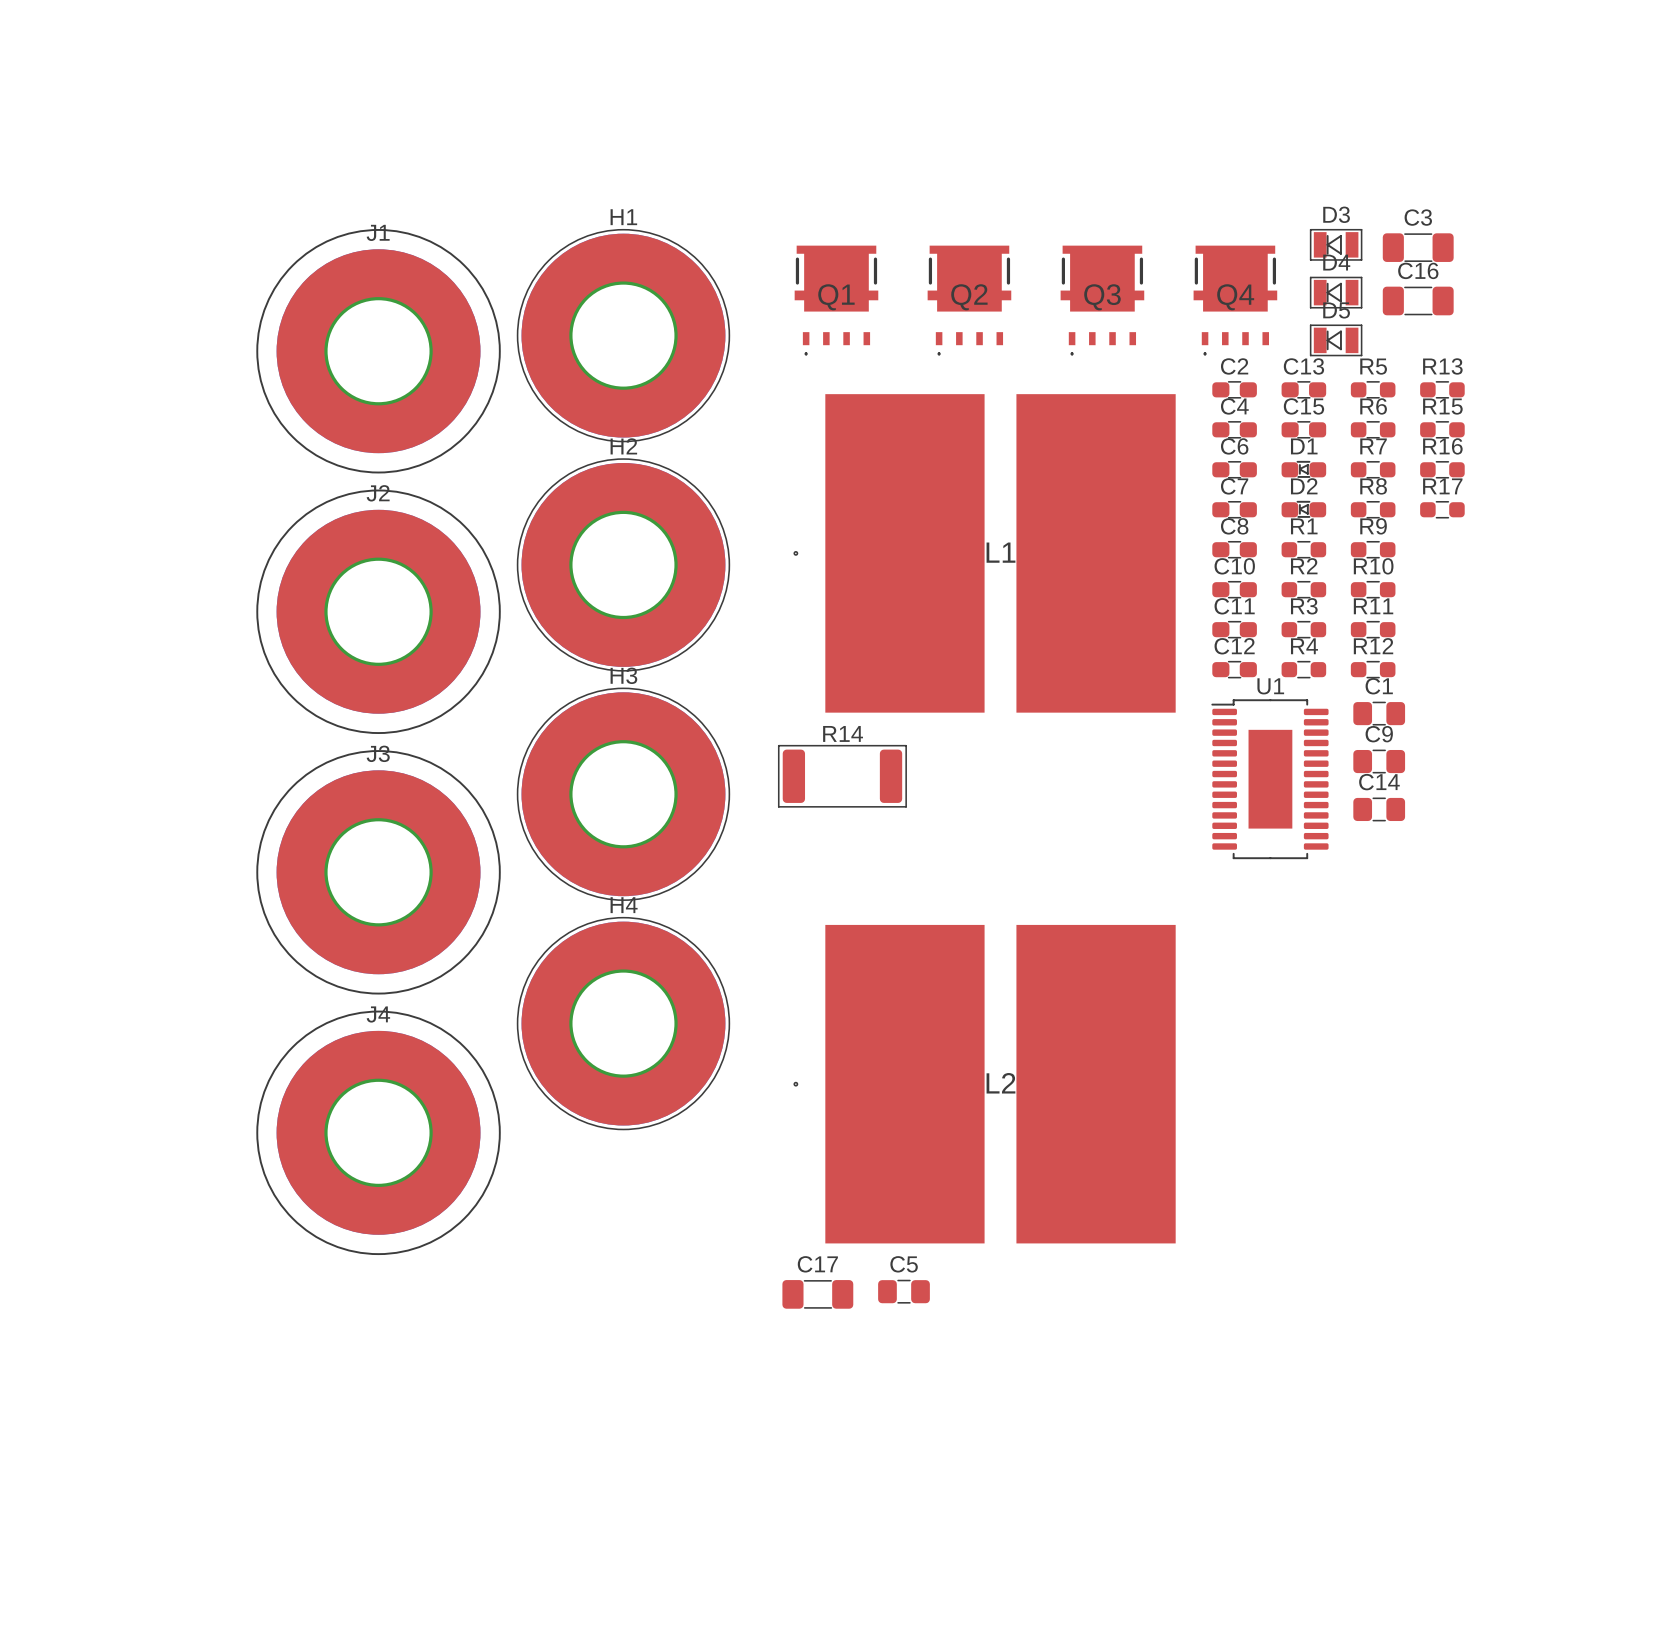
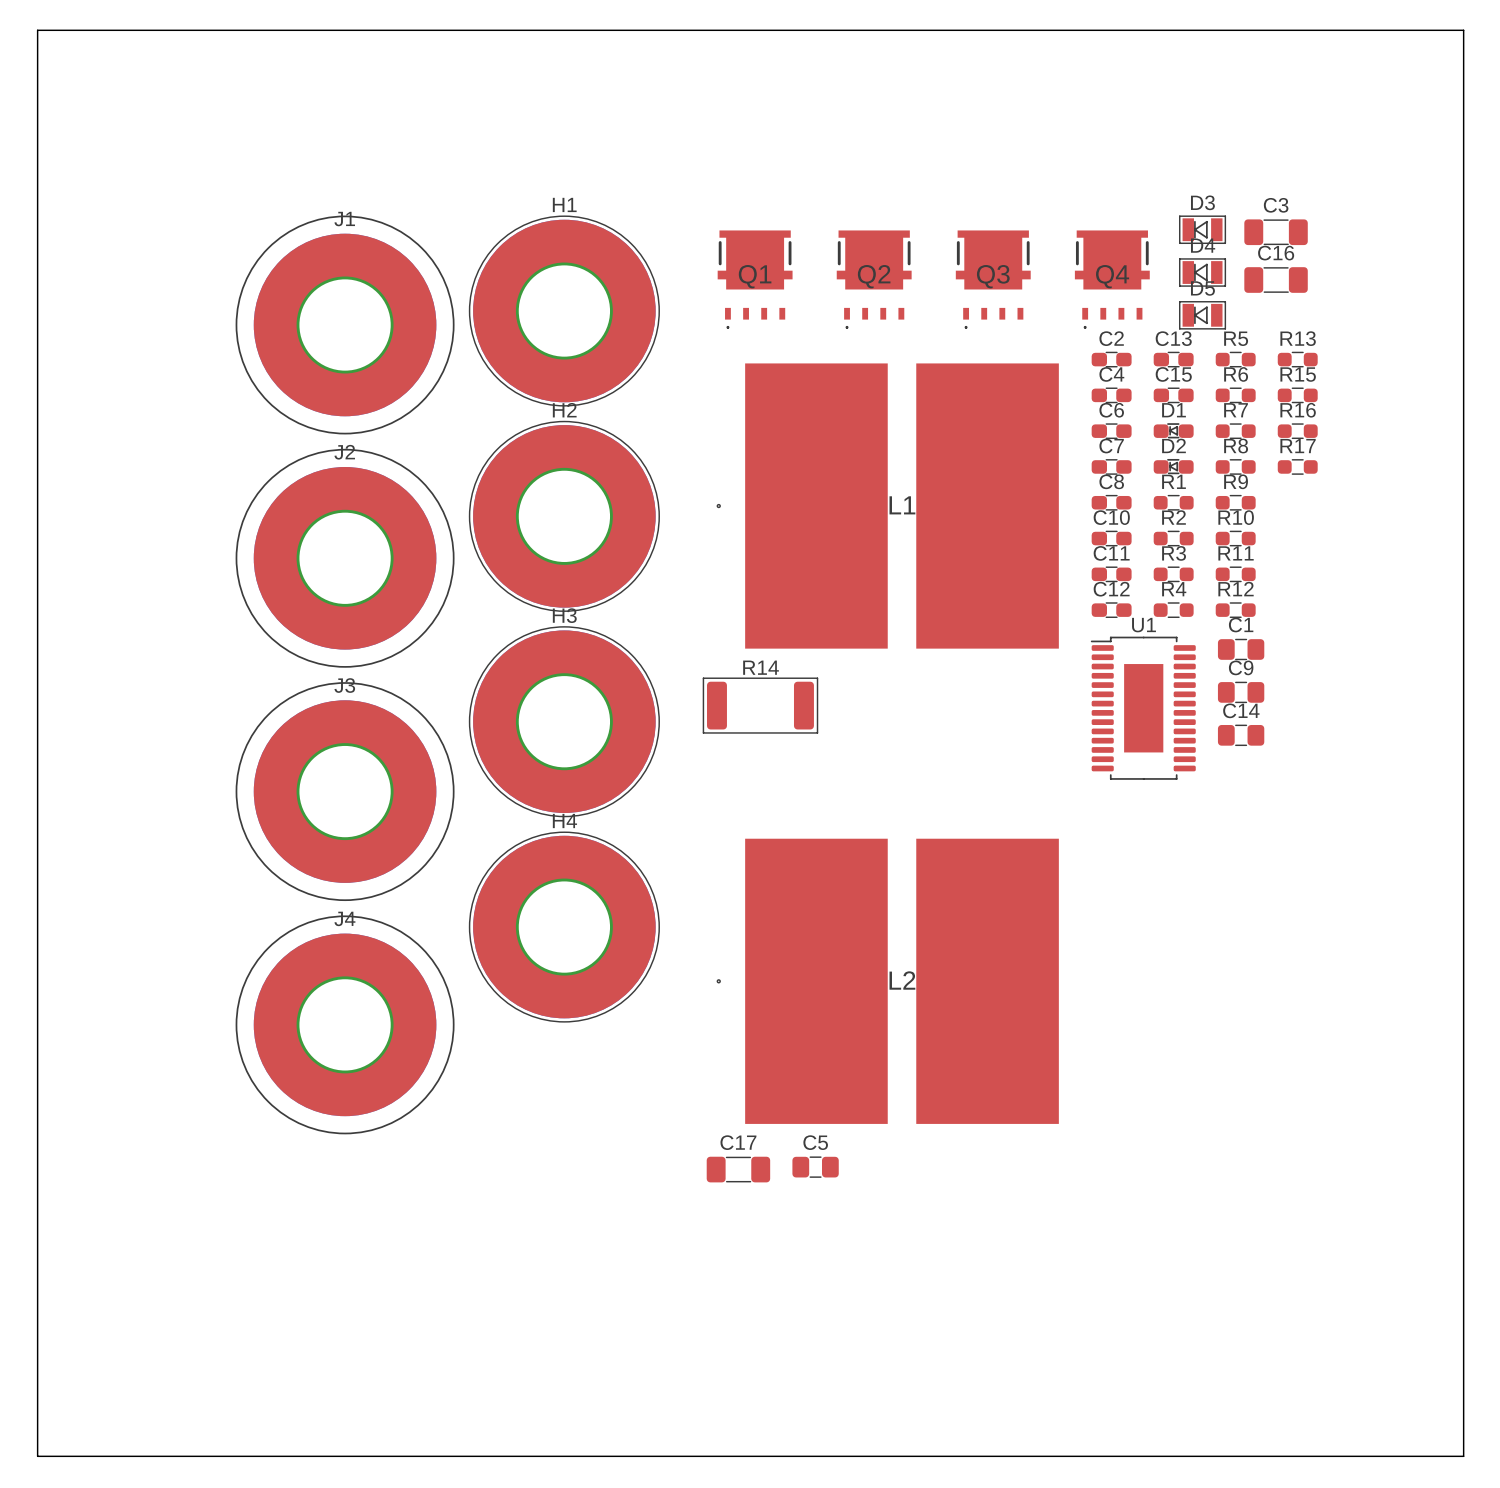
board edge: none -> (37, 30) (1463, 30) (1463, 1456) (37, 1456) (37, 30)

